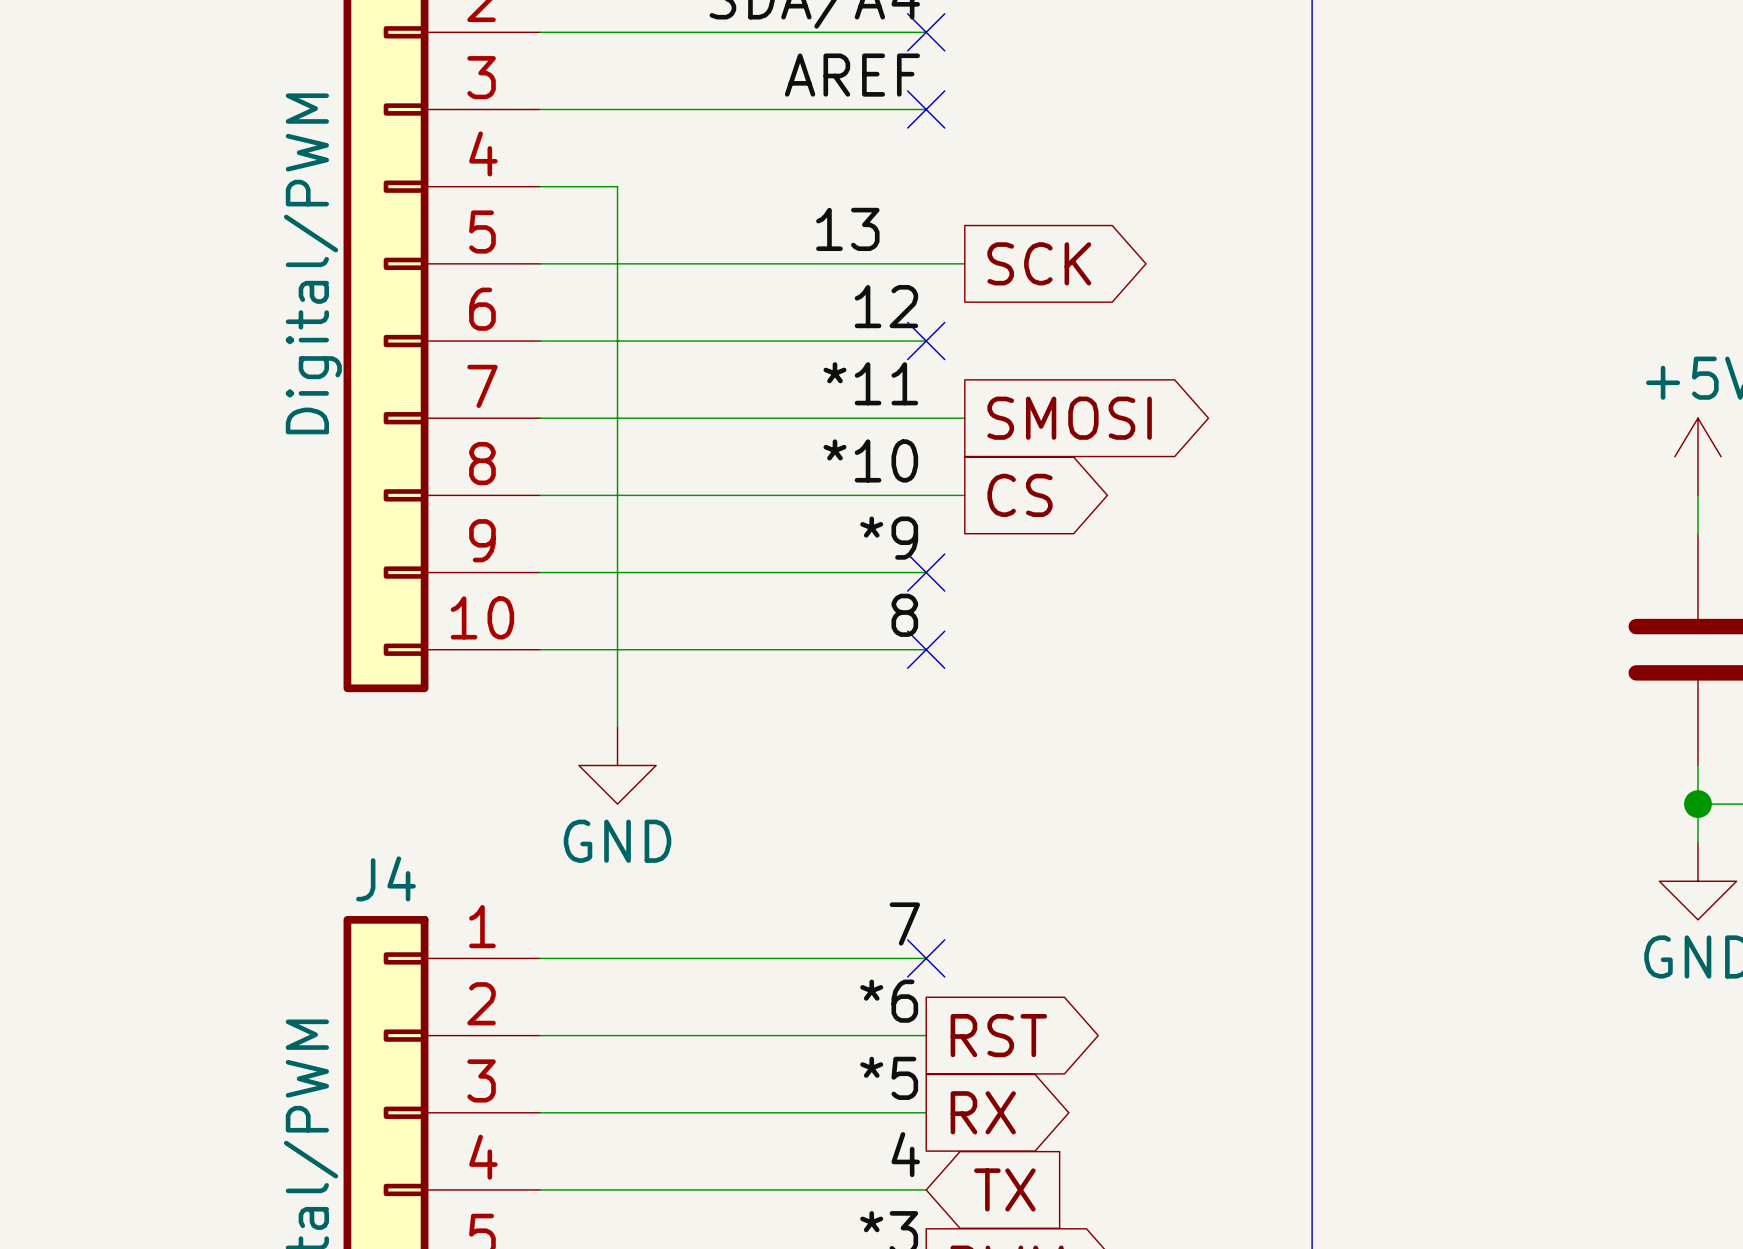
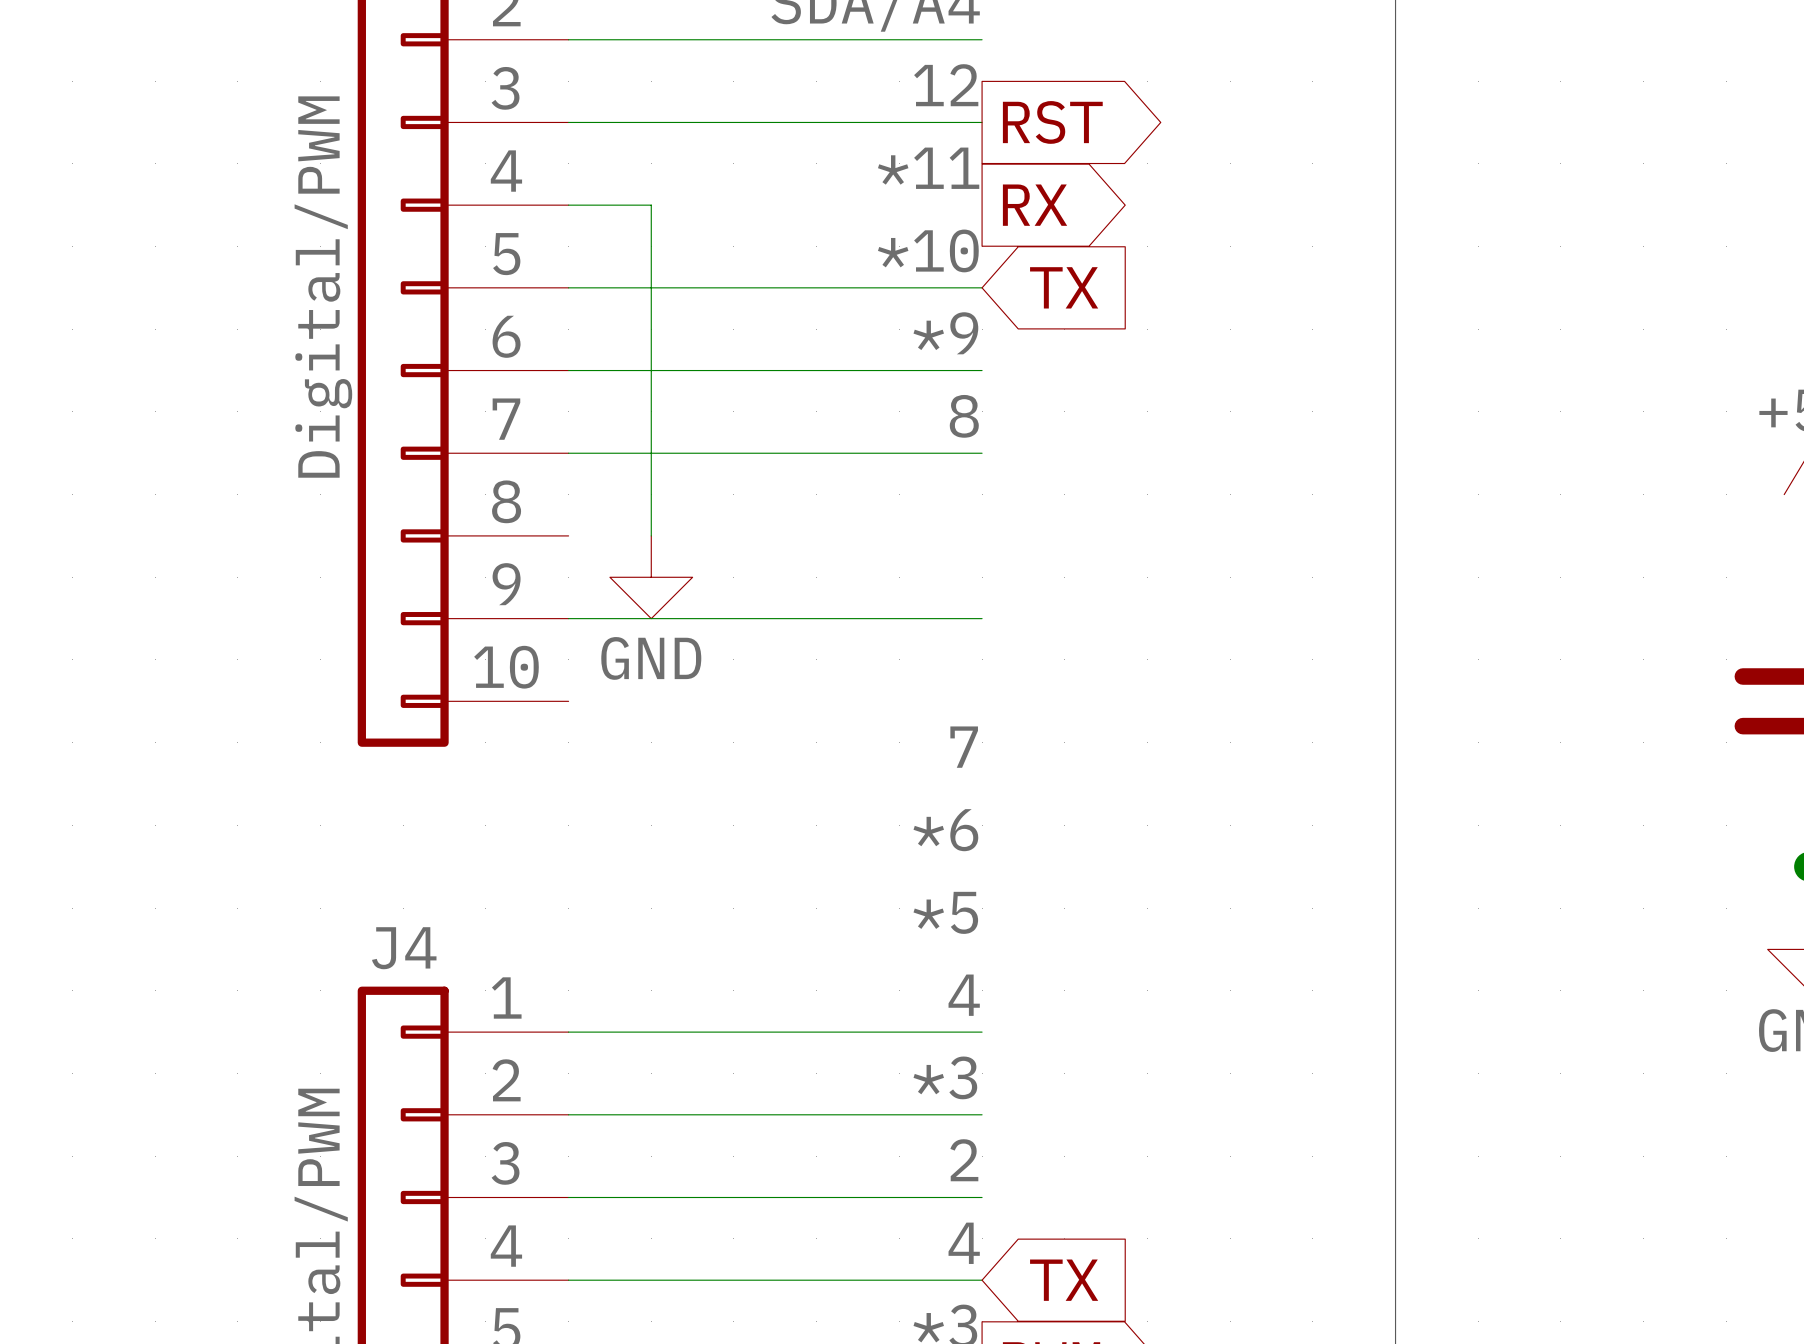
no-connect mark: (926, 32) -> none
label: AREF (852, 75) -> 12 (946, 85)
no-connect mark: (926, 109) -> none
global label: none -> RST (1052, 122)
label: none -> *11 (928, 168)
global label: none -> RX (1035, 205)
label: 13 (847, 229) -> none
wire: (926, 263) (964, 263) -> none
global label: none -> TX (1064, 287)
global label: SCK (1039, 263) -> none
label: 12 (886, 306) -> *9 (945, 333)
no-connect mark: (926, 341) -> none
label: *11 (870, 383) -> 8 (964, 416)
wire: (926, 418) (964, 418) -> none
global label: SMOSI (1069, 418) -> none
label position: *10 (870, 460) -> *10 (928, 250)
wire: (540, 495) (964, 495) -> none
wire: (617, 495) (617, 726) -> none
global label: CS (1020, 495) -> none
label: *9 (889, 538) -> none
no-connect mark: (926, 572) -> none
label: 8 (904, 615) -> none
wire: (540, 649) (926, 649) -> none
no-connect mark: (926, 649) -> none
label: none -> 7 (964, 747)
power symbol position: GND (617, 765) -> GND (651, 577)
label: none -> *6 (945, 830)
label: none -> *5 (945, 912)
label: 7 (904, 923) -> 4 (964, 995)
no-connect mark: (926, 958) -> none
label: *6 (889, 1001) -> *3 (945, 1077)
global label: RST (998, 1035) -> none
label: *5 (889, 1078) -> 2 (964, 1160)
global label: RX (983, 1112) -> none

